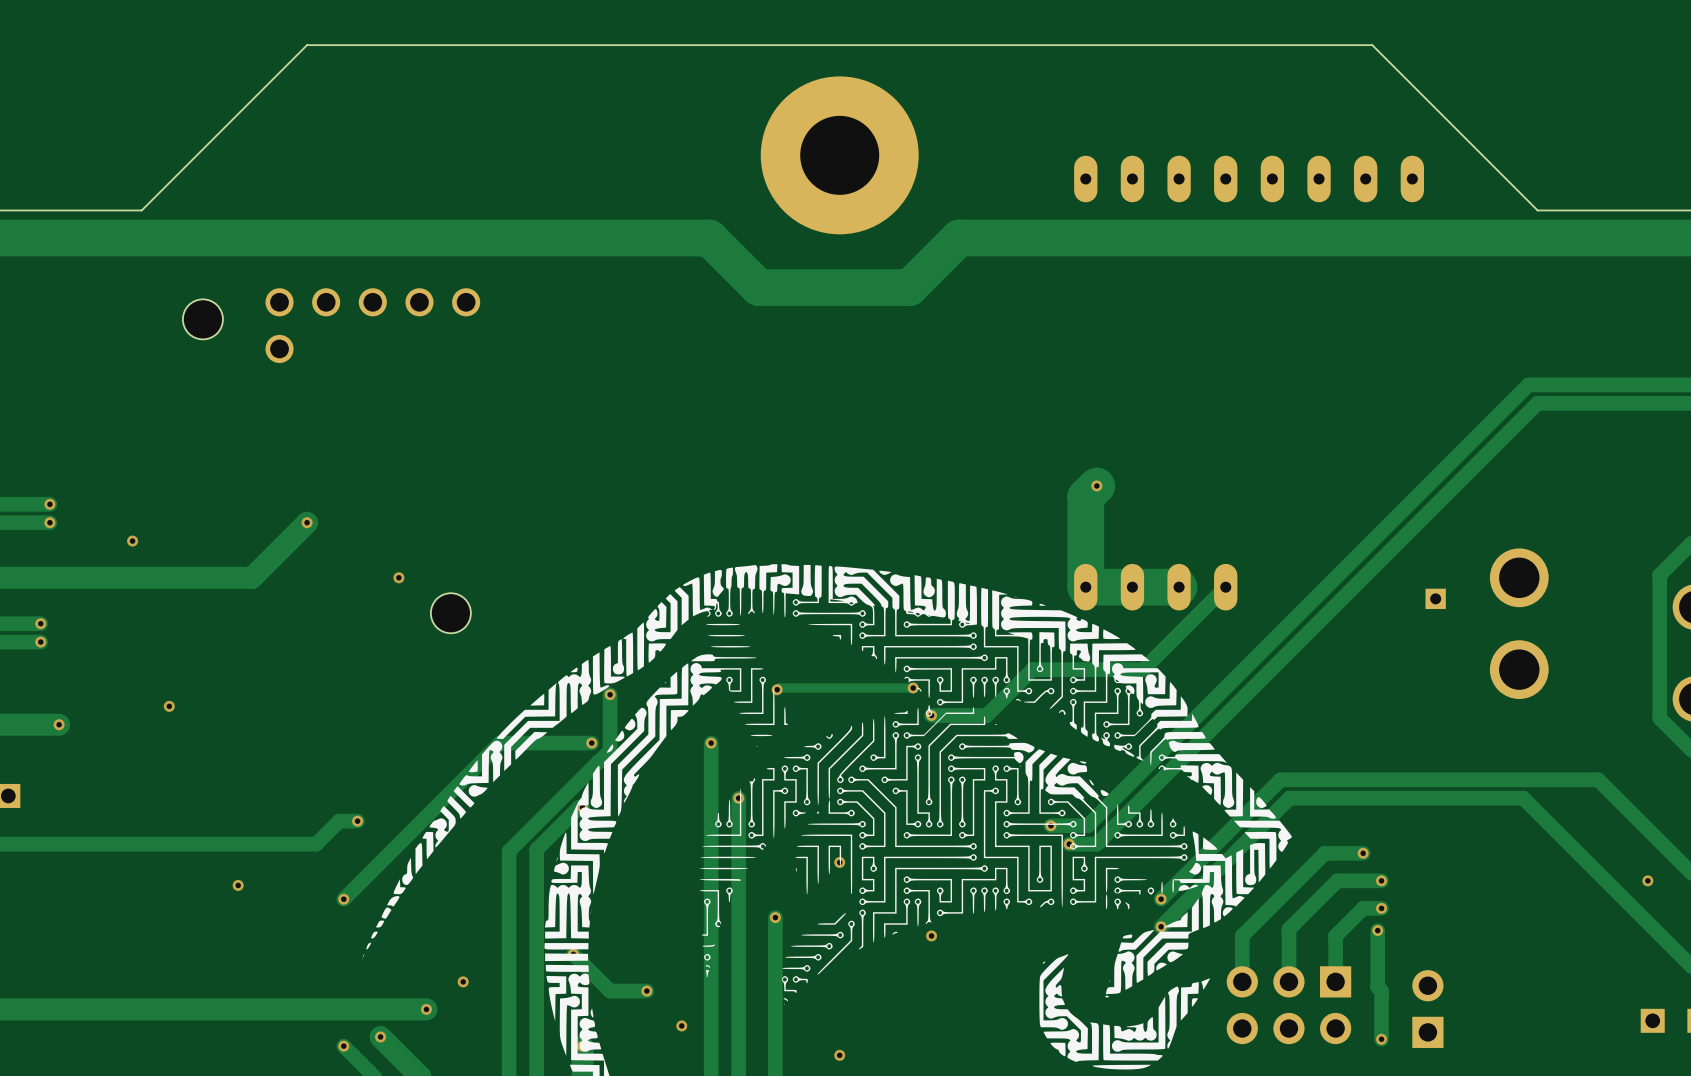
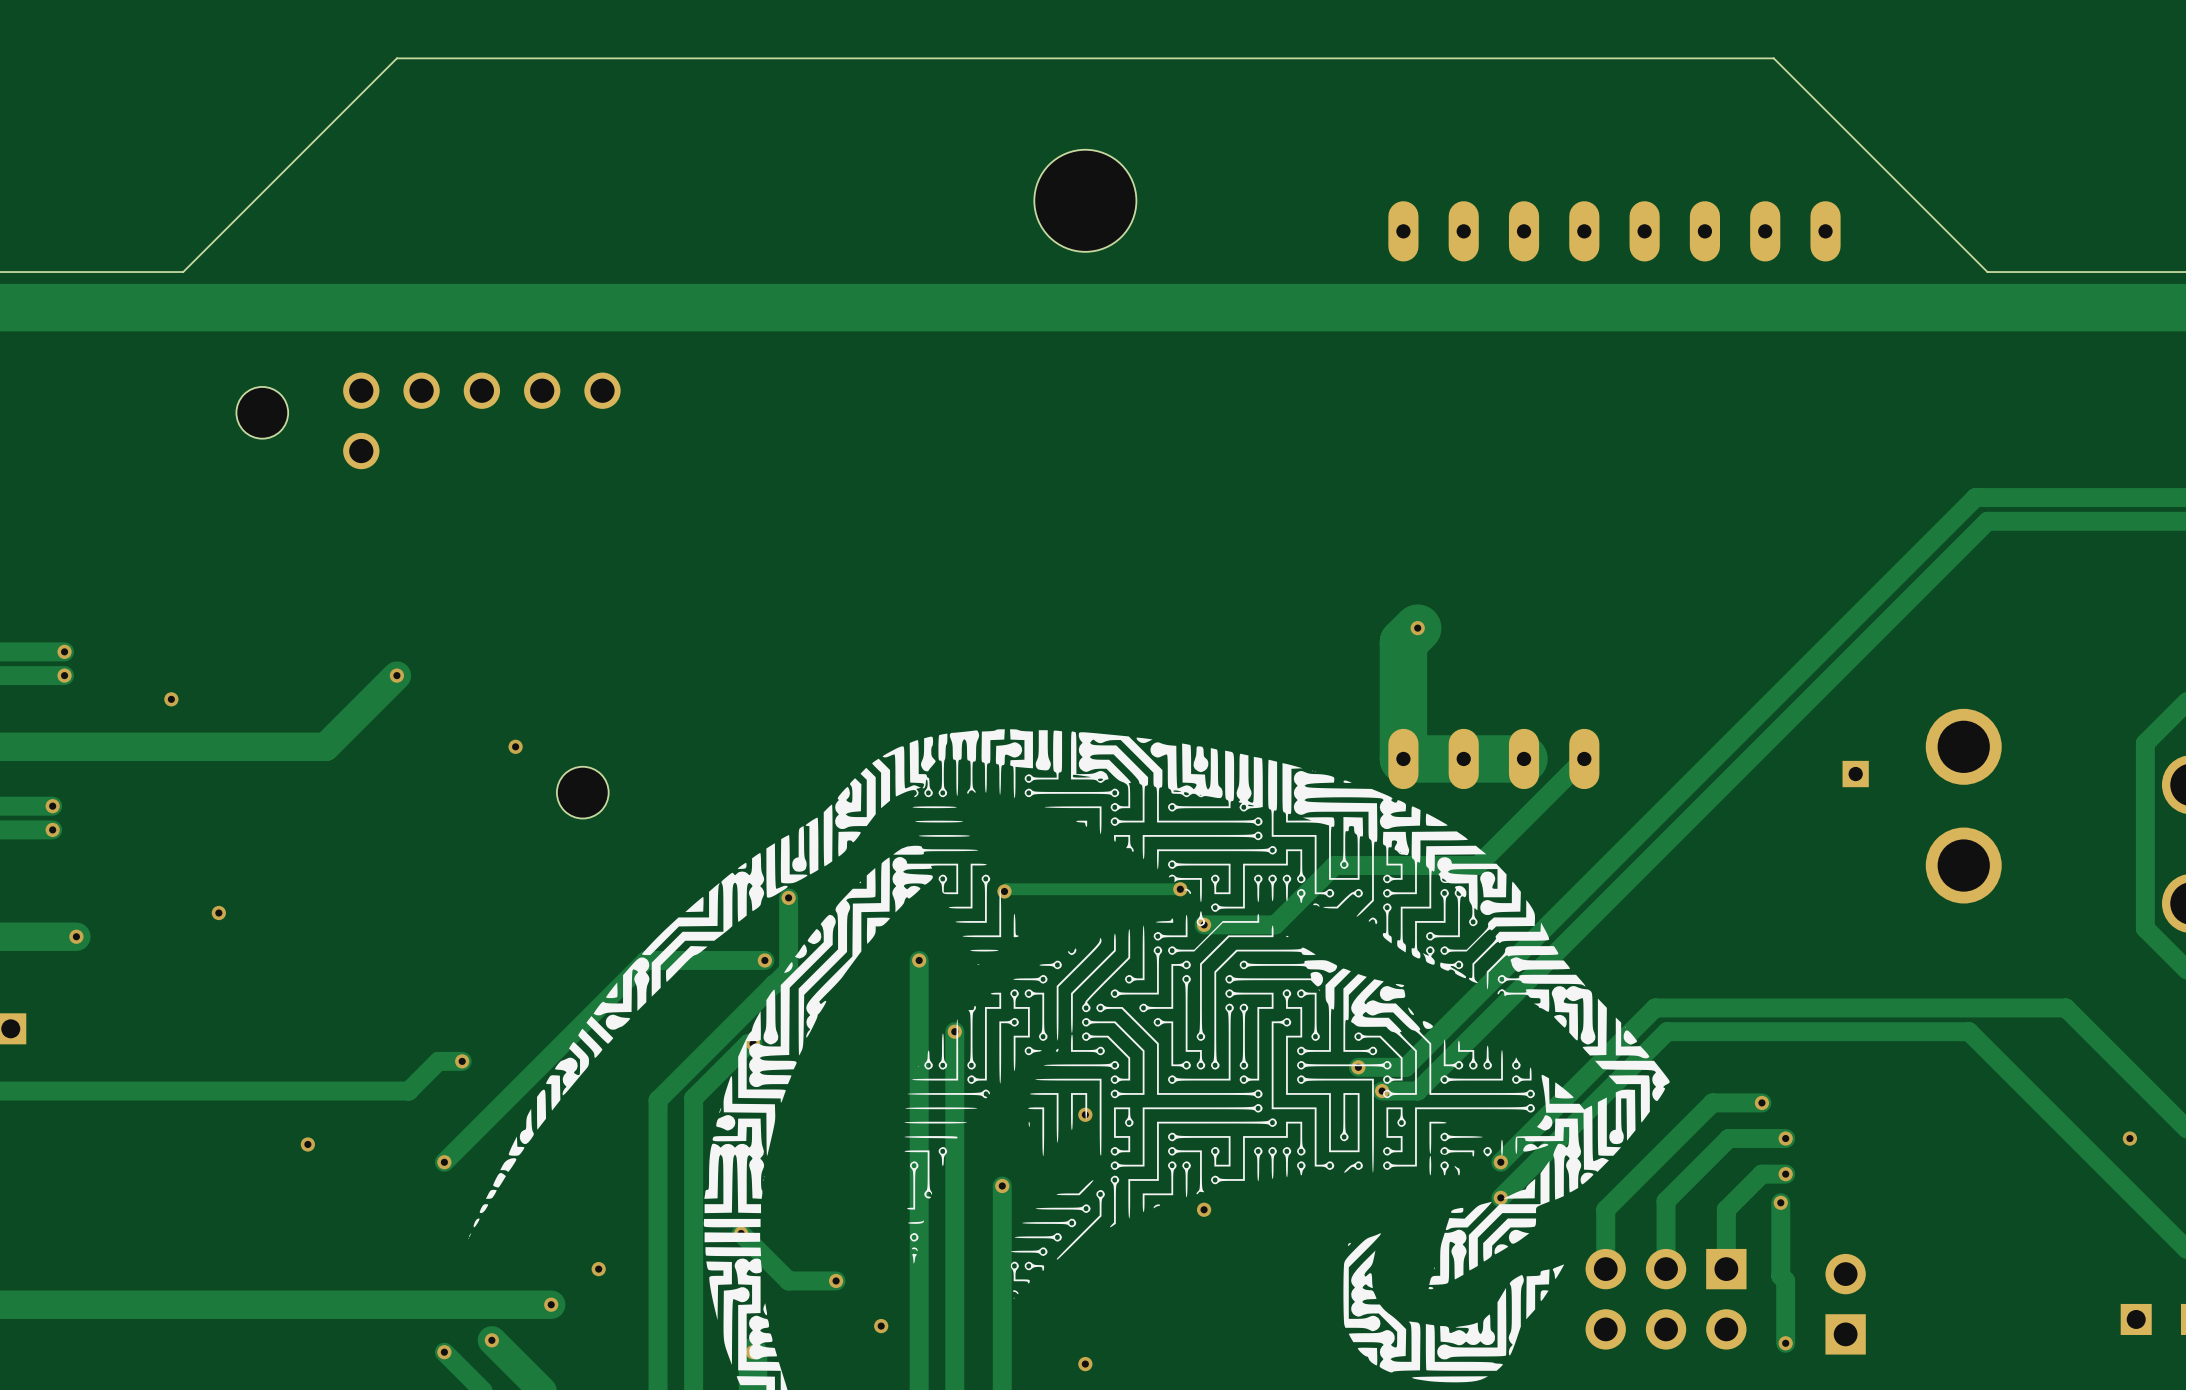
part footprint: [760, 76, 919, 235] -> [1034, 149, 1137, 252]
track: (959, 238) (909, 287) (758, 287) (709, 238) -> (1239, 307) (916, 307)

